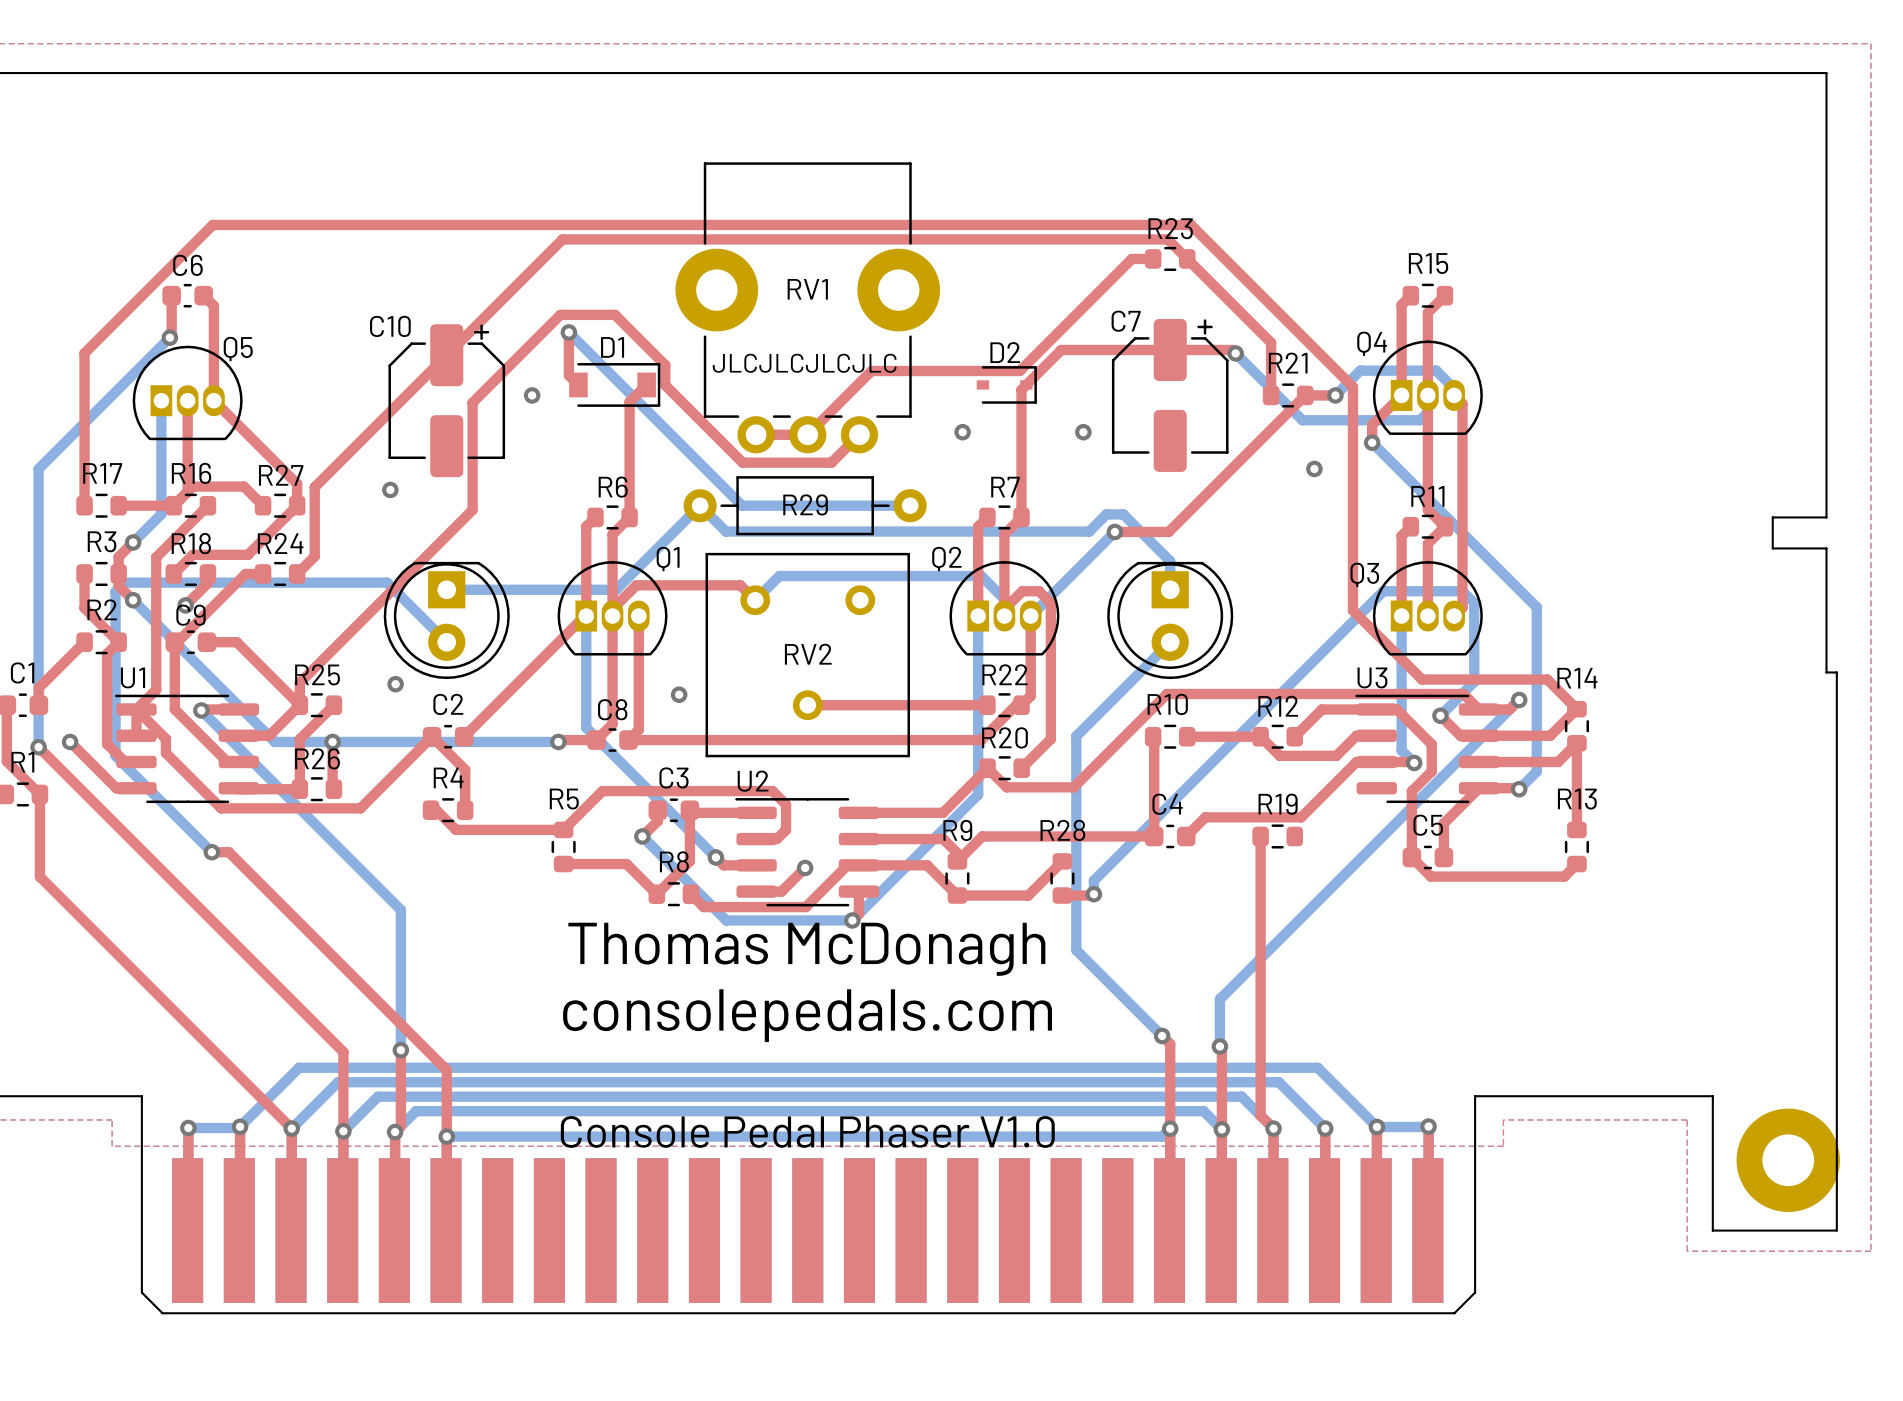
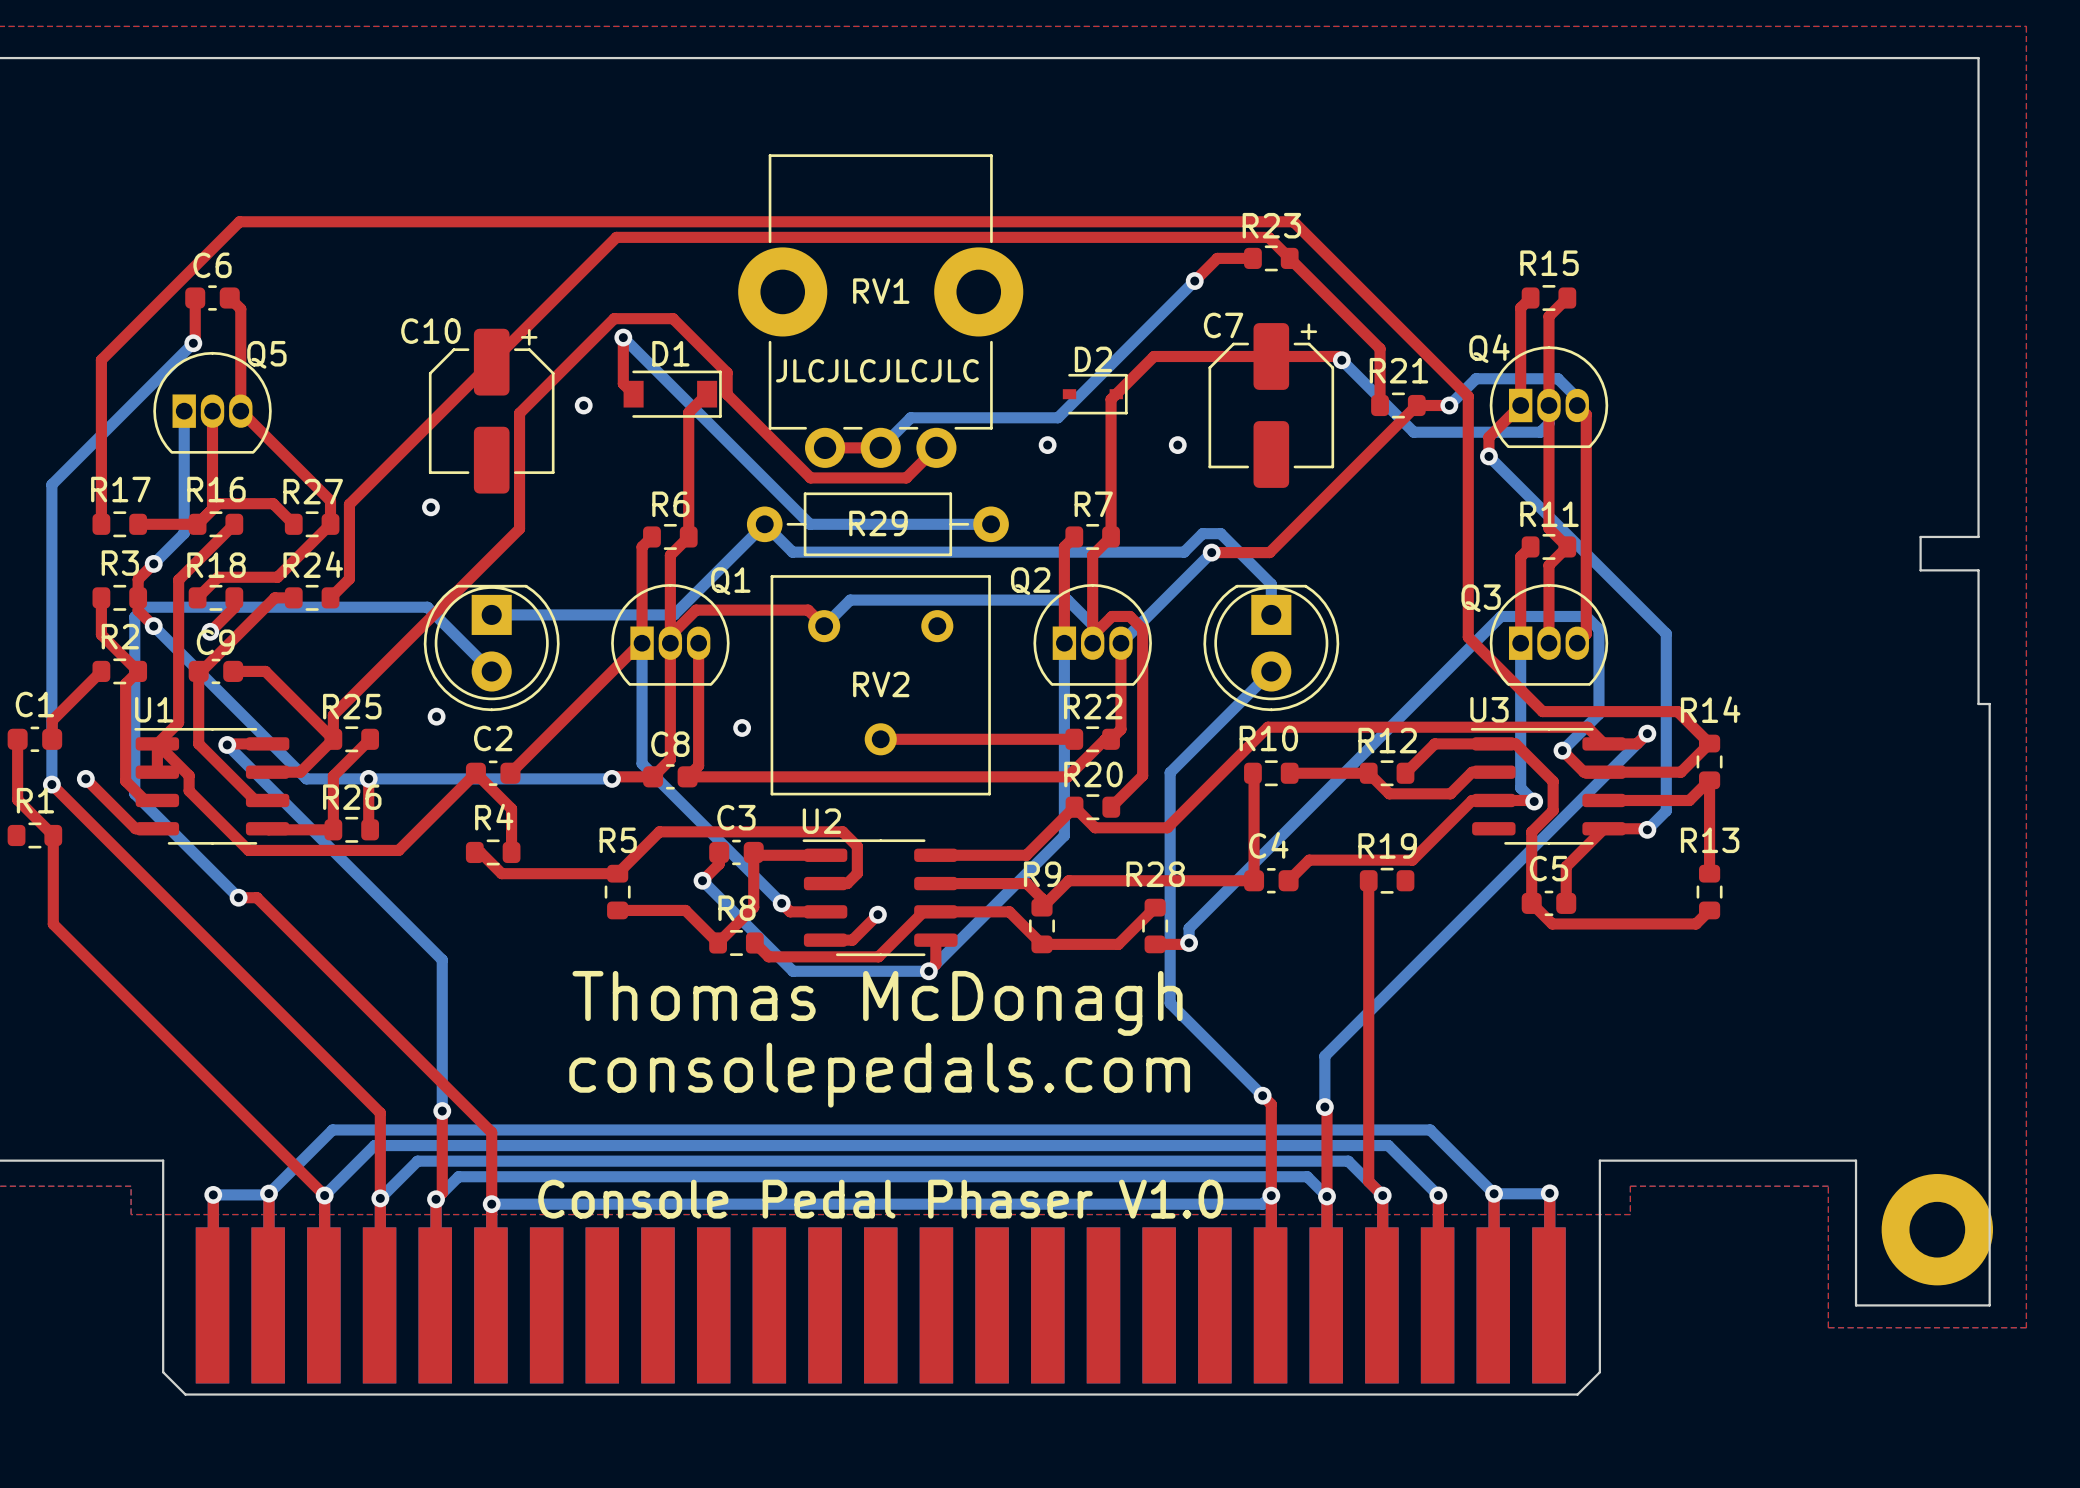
top track: (1131, 258) (1019, 371) (871, 371) (807, 434) -> (1230, 258) (1217, 258) (1194, 281)
bottom track: none -> (1194, 281) (1057, 417) (910, 417) (880, 447)
via: none -> (1194, 281)
via: (1314, 468) -> none

